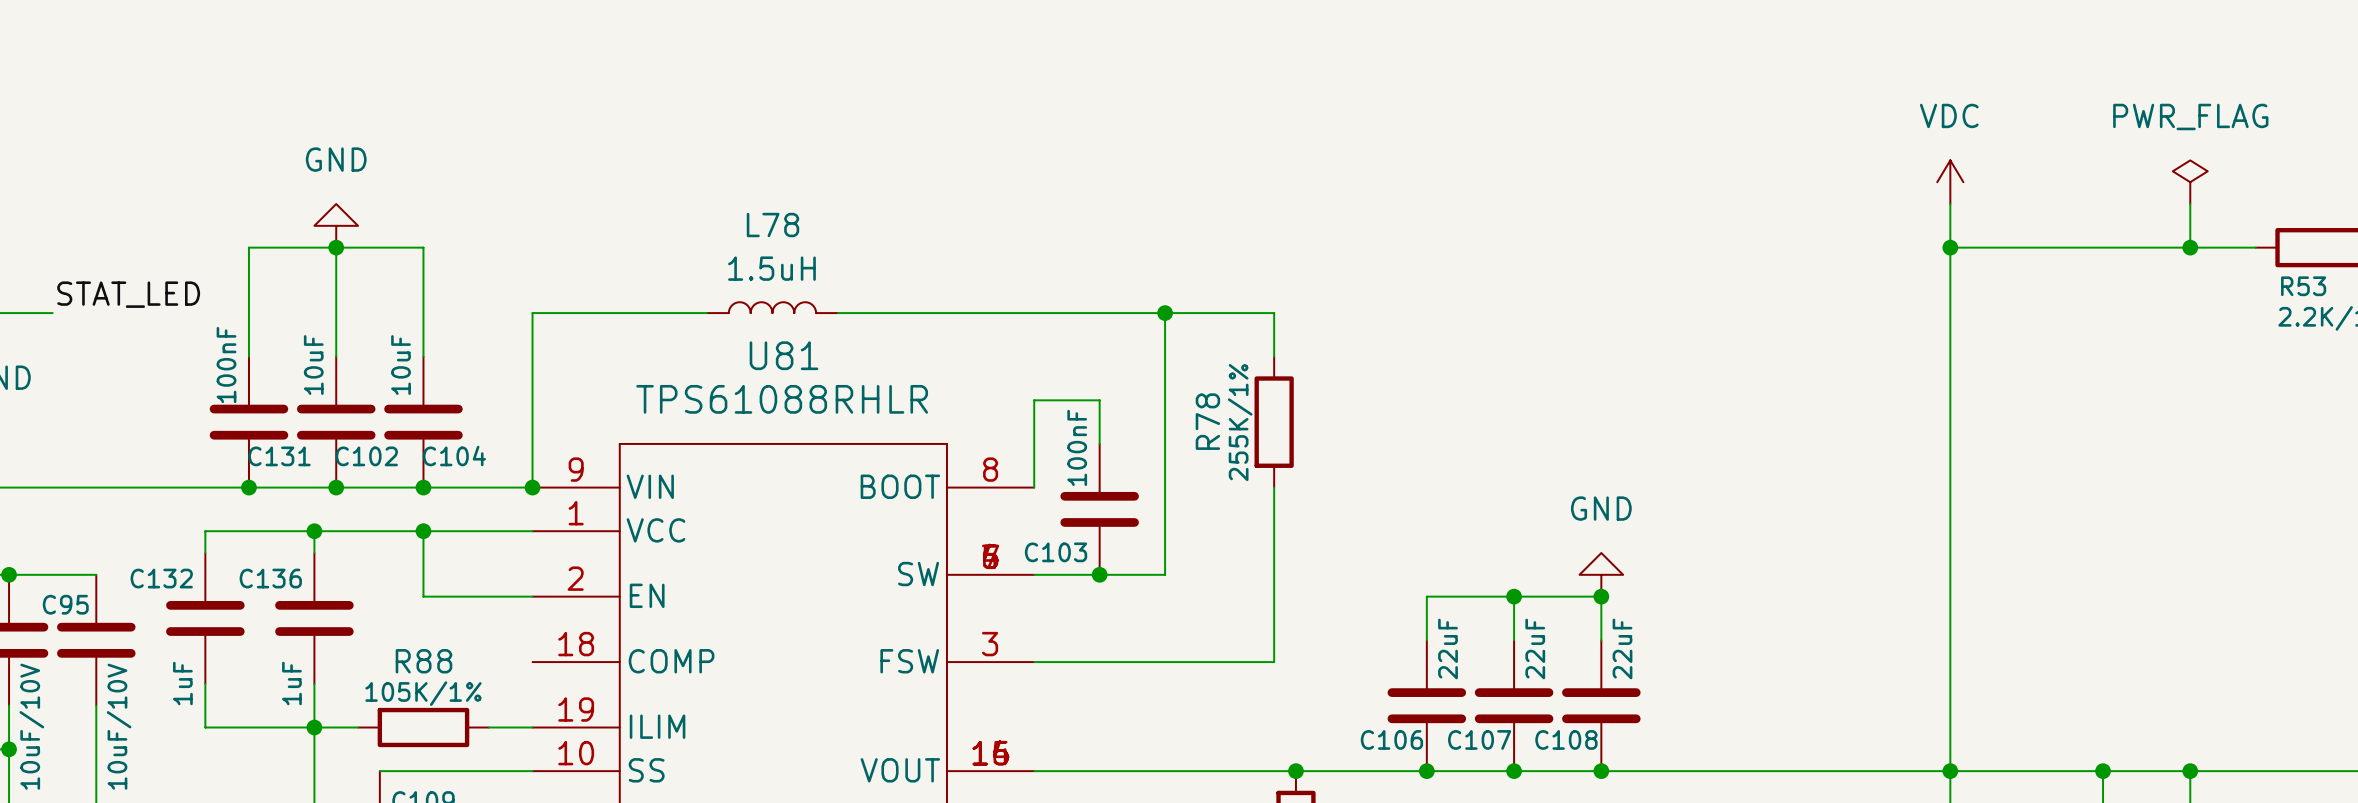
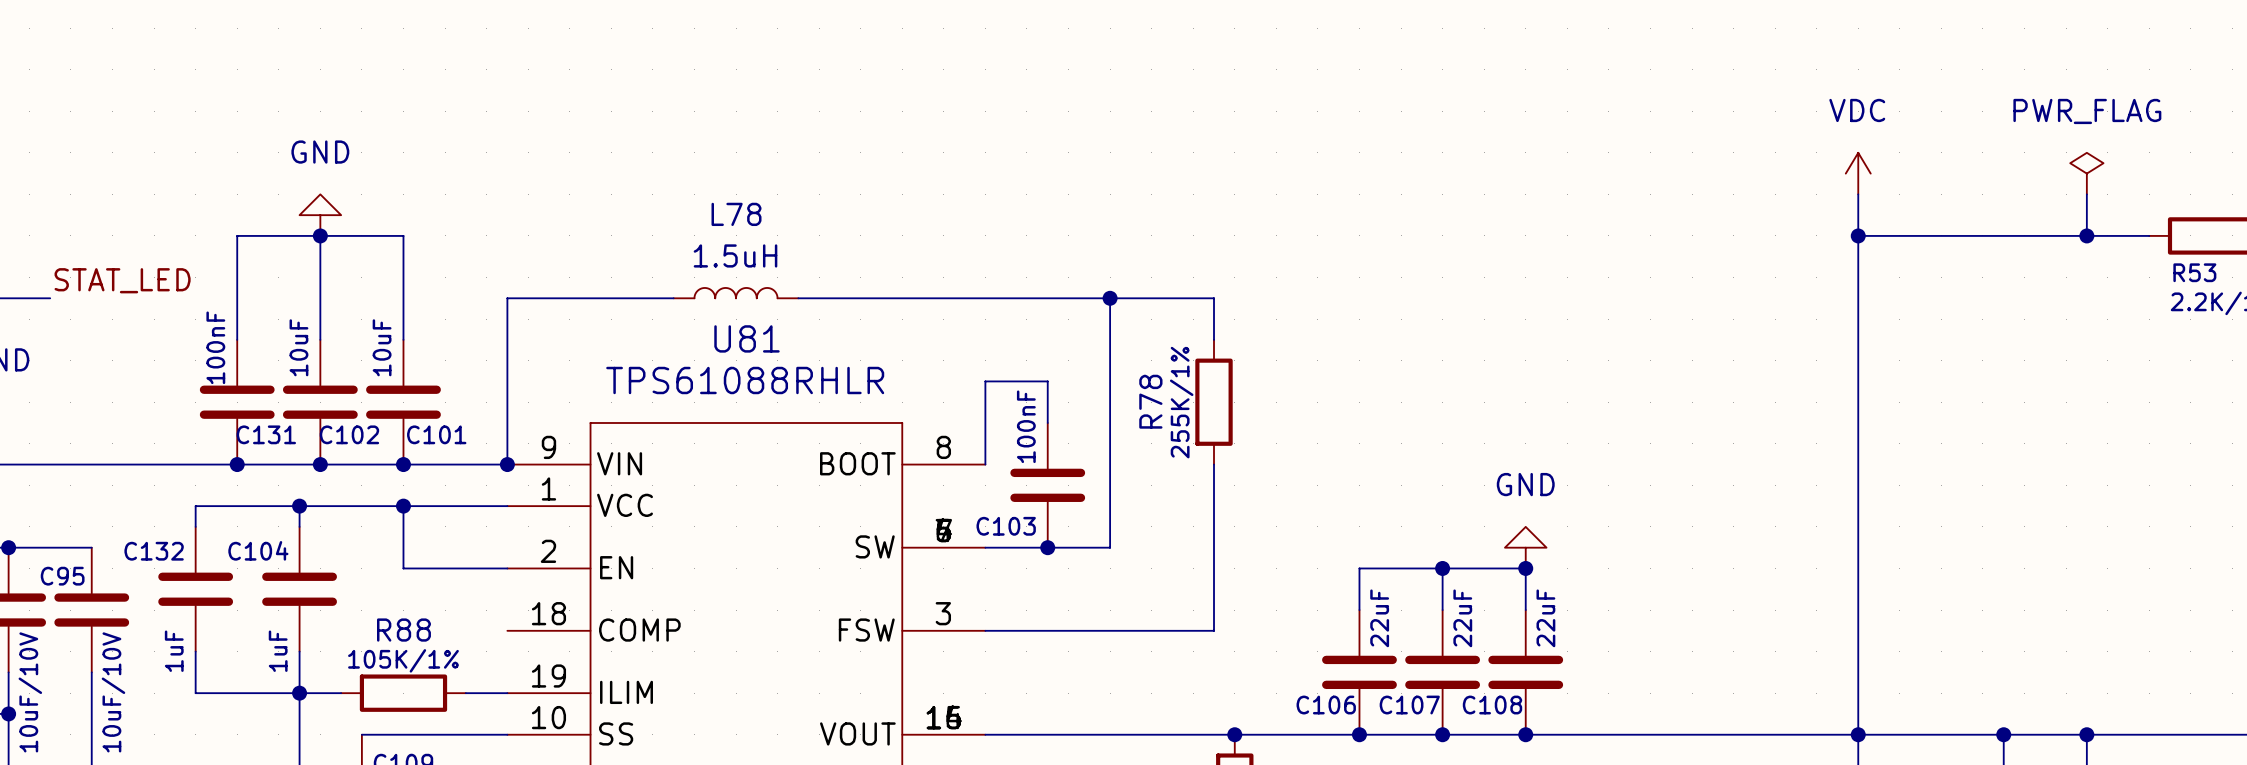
C104 name: C104 (454, 455) -> C101 (436, 434)
C136 name: C136 (270, 578) -> C104 (258, 550)

